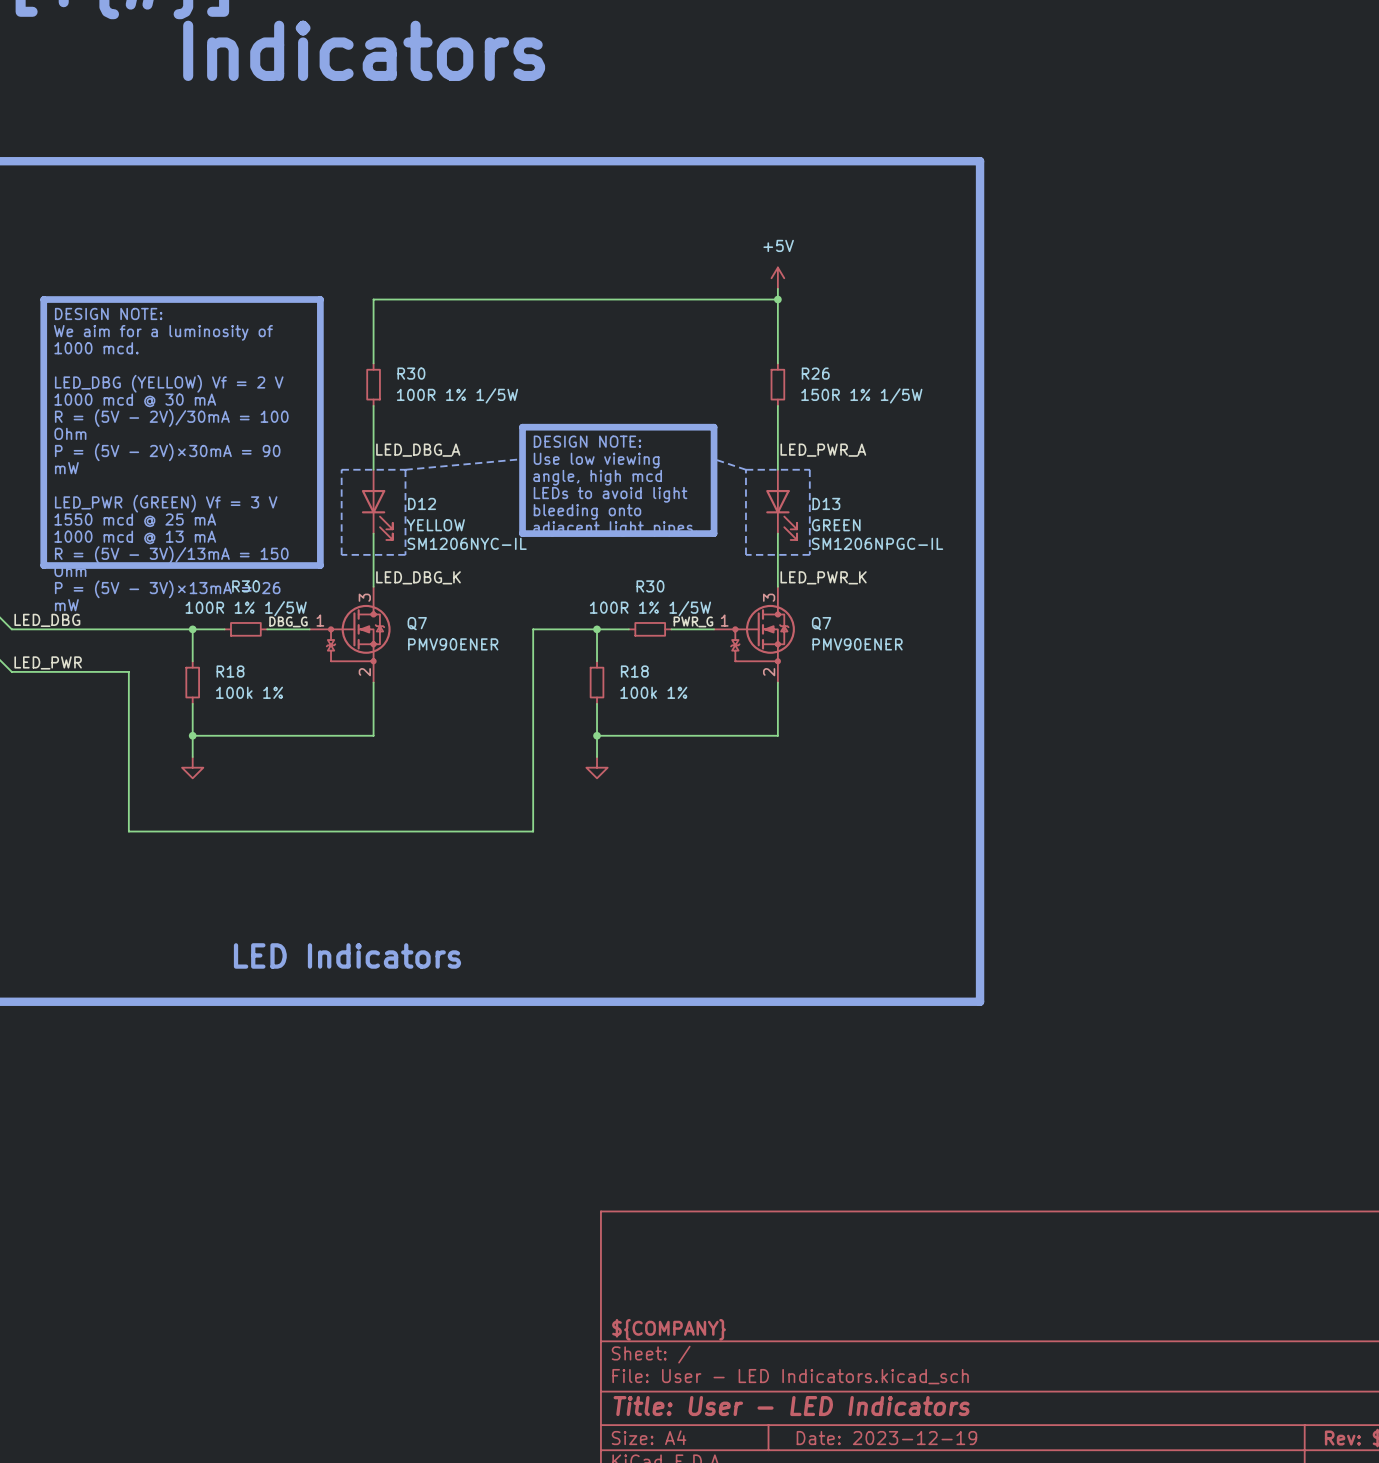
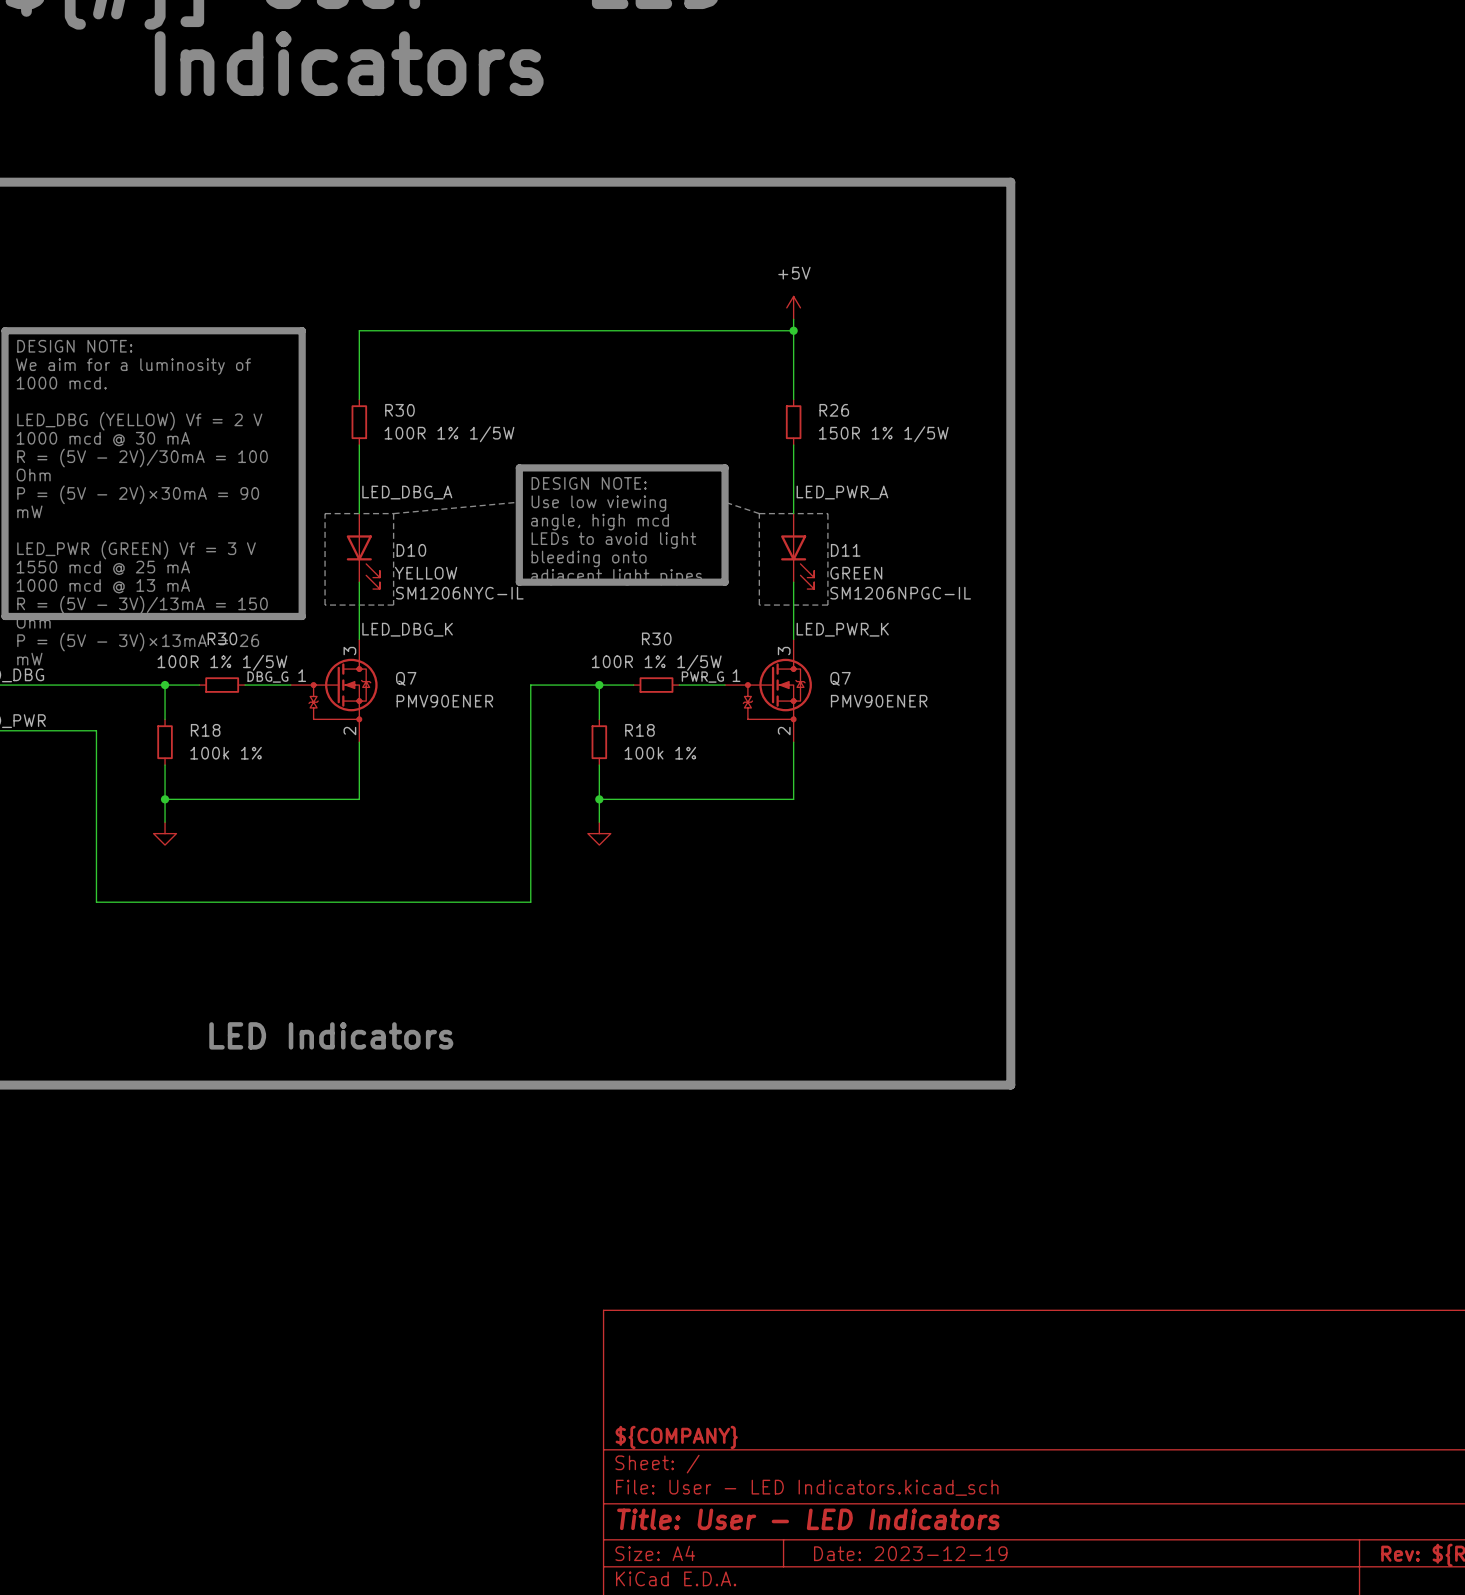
D12 name: D12 (422, 503) -> D10 (411, 550)
D13 name: D13 (826, 503) -> D11 (845, 550)

